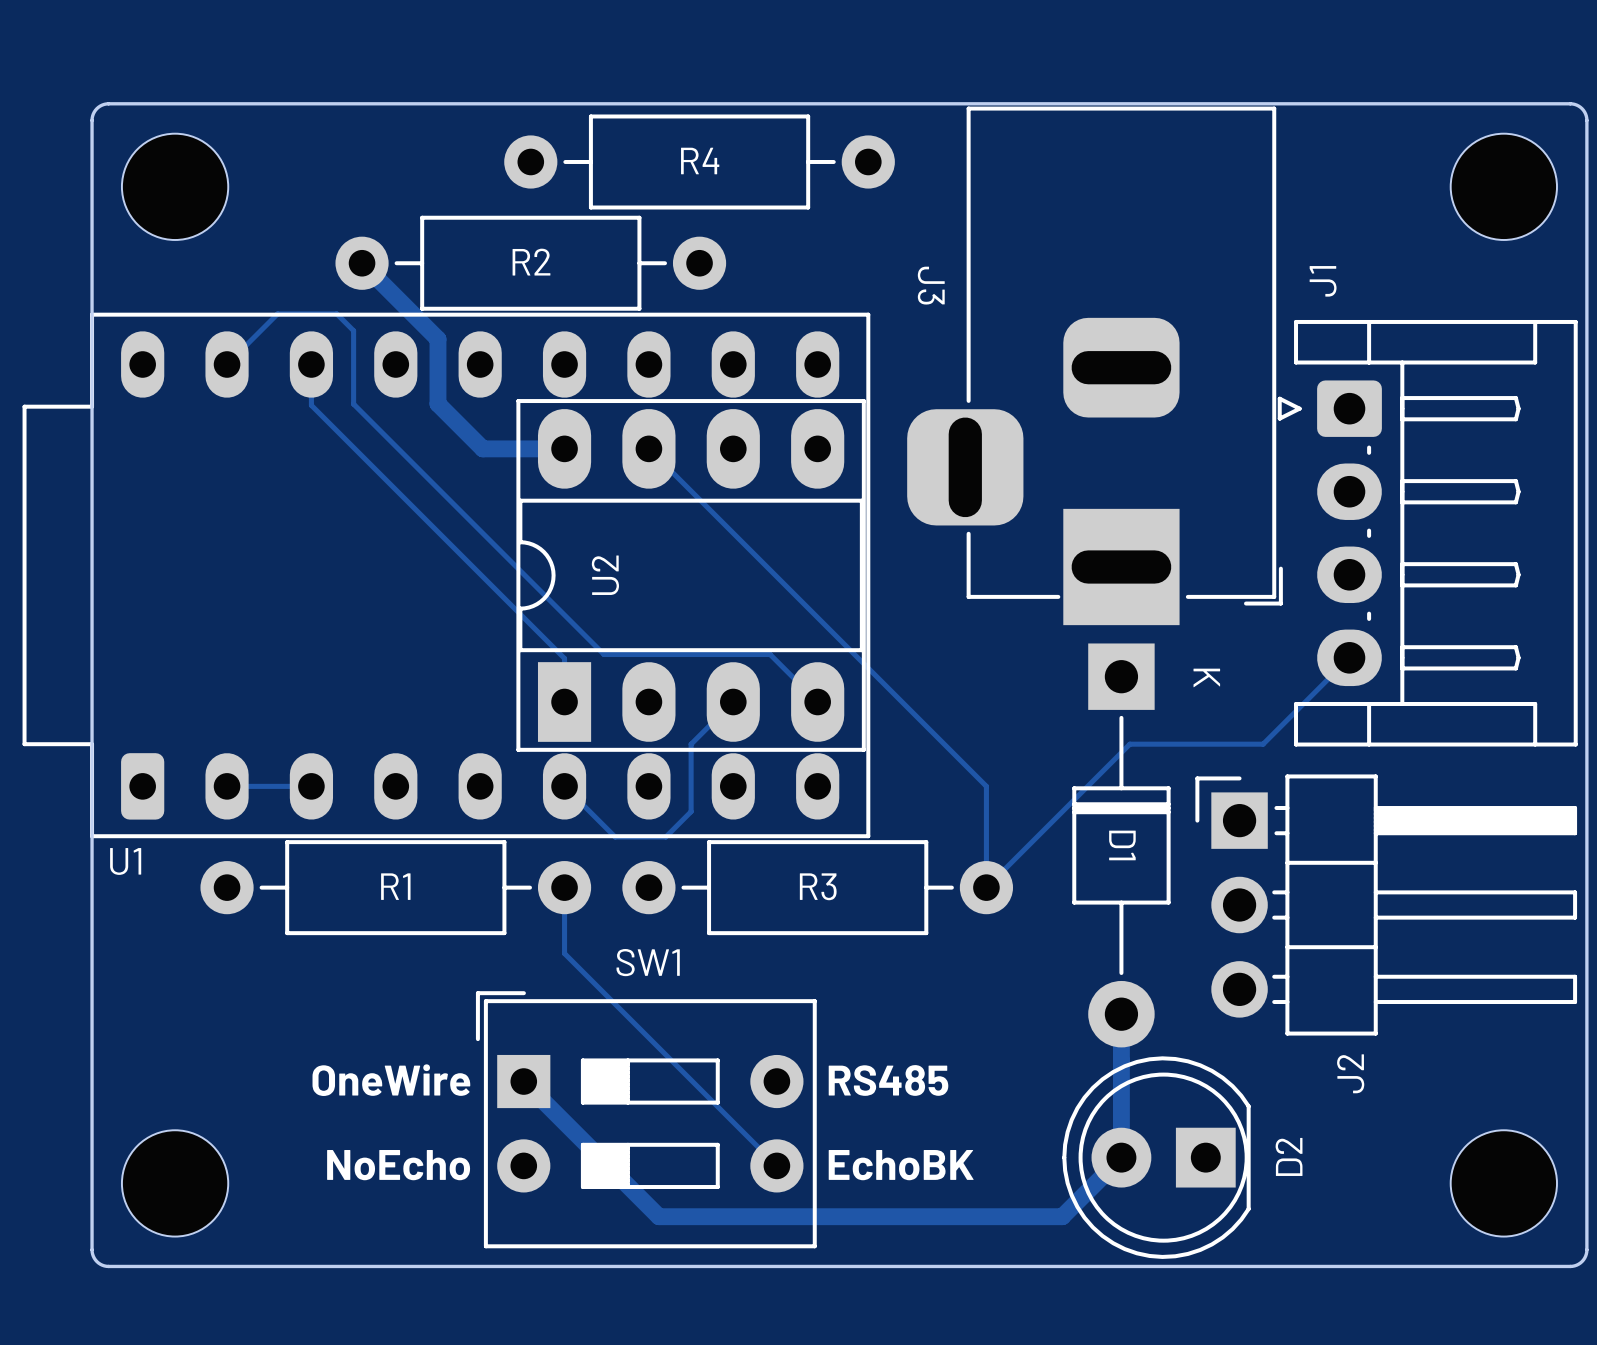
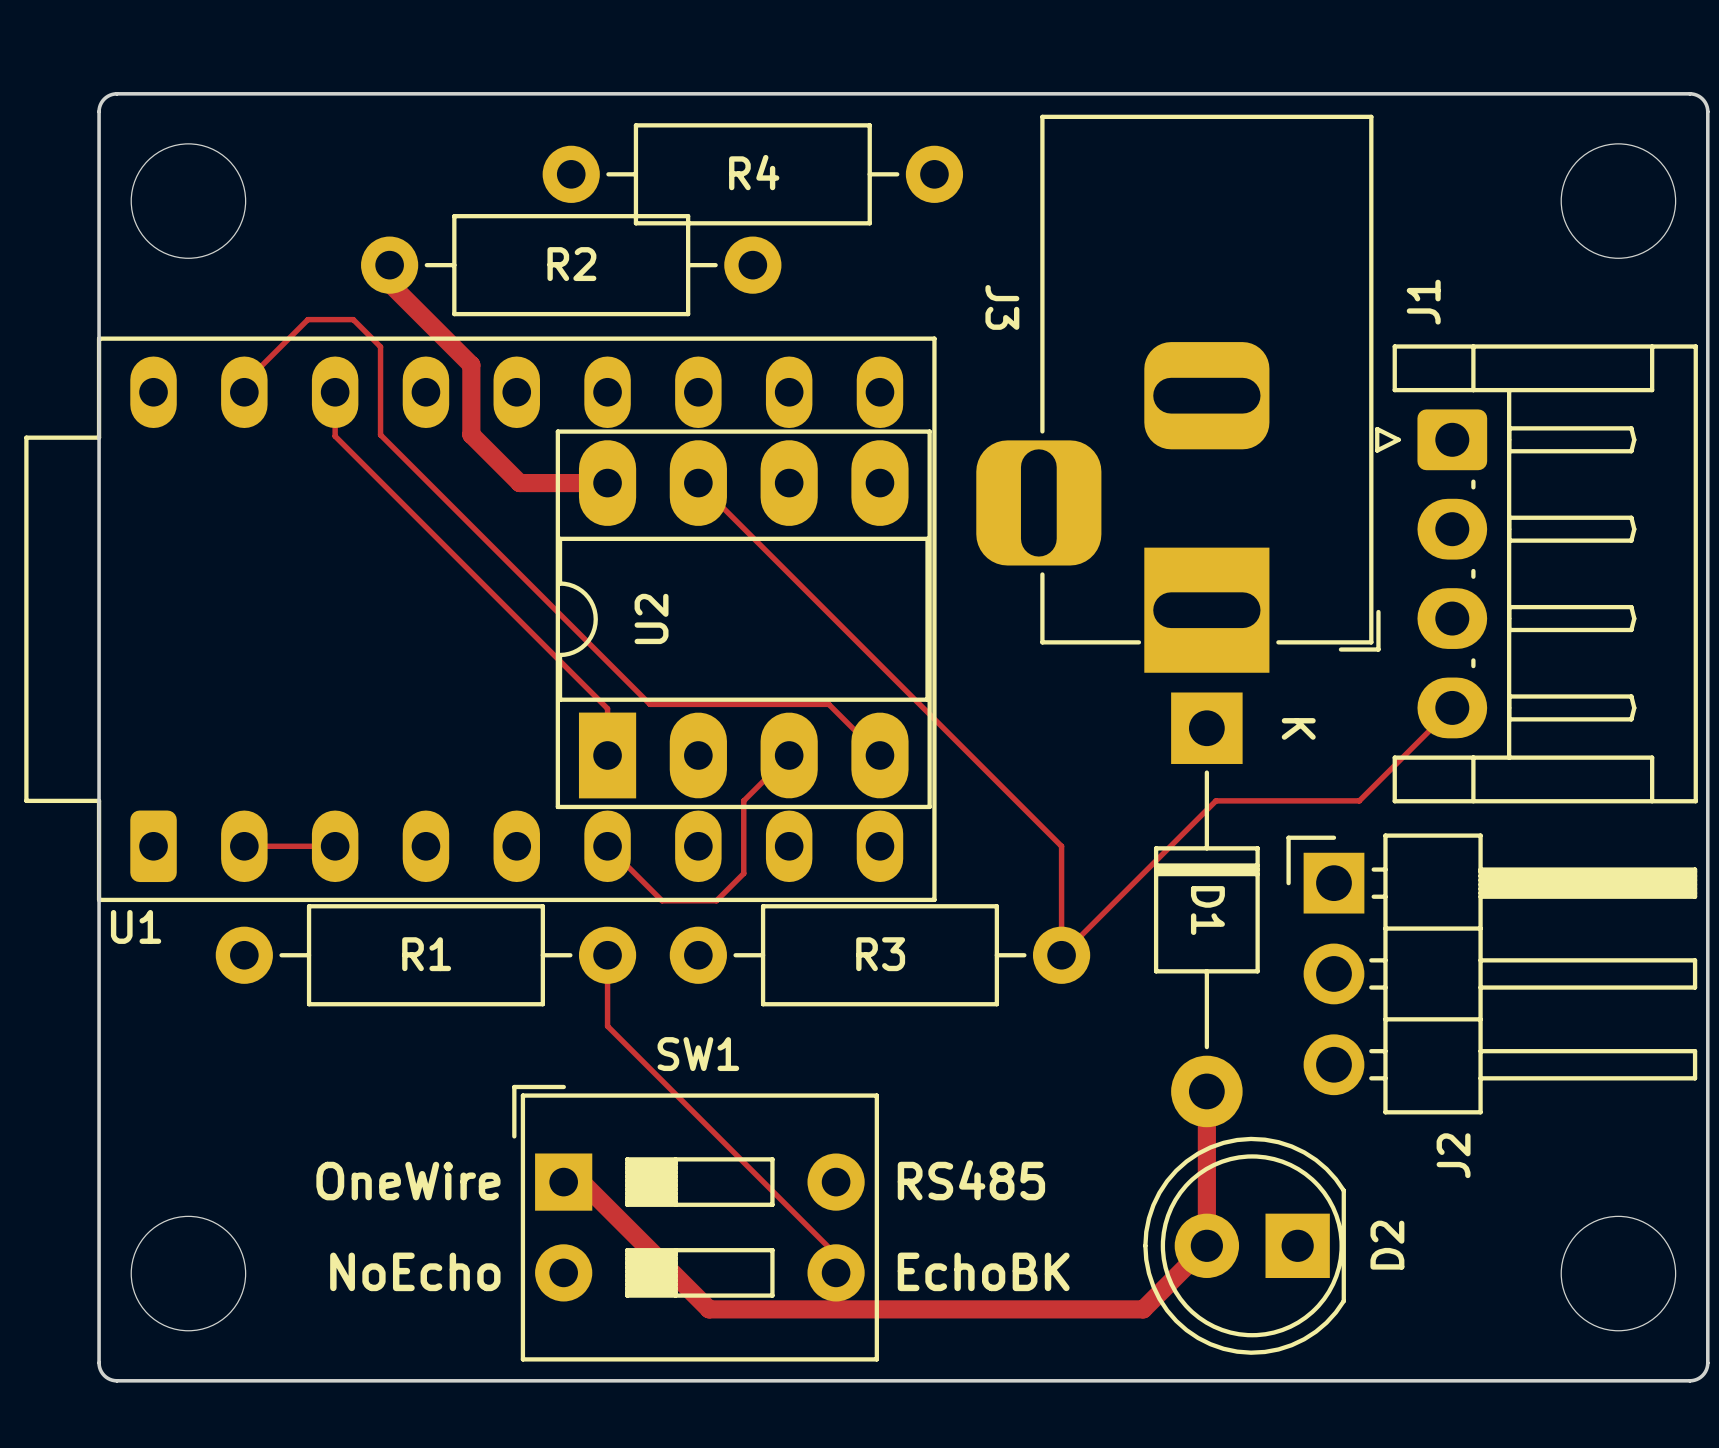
board edge: (92, 120) (96, 108) (108, 103) (1570, 103) (1582, 108) (1586, 120) -> (99, 129) (99, 109) (101, 102) (107, 96) (116, 93) (1689, 93) (1698, 96) (1705, 102) (1707, 109) (1707, 129)
R2 position: (530, 263) -> (571, 265)
track: (353, 330) (336, 313) (277, 313) (227, 364) -> (380, 355) (380, 346) (353, 319) (307, 319) (244, 383)
text position: OneWire (391, 1080) -> OneWire (408, 1181)
text position: RS485 (888, 1080) -> RS485 (971, 1180)
SW1 position: (646, 1119) -> (695, 1223)
text position: NoEcho (398, 1165) -> NoEcho (415, 1271)
text position: EchoBK (901, 1165) -> EchoBK (983, 1271)
board edge: (92, 1249) (96, 1261) (108, 1266) (1570, 1266) (1582, 1261) (1586, 1249) -> (99, 1345) (99, 1365) (101, 1371) (107, 1378) (116, 1380) (1689, 1380) (1698, 1378) (1705, 1371) (1707, 1365) (1707, 1345)

